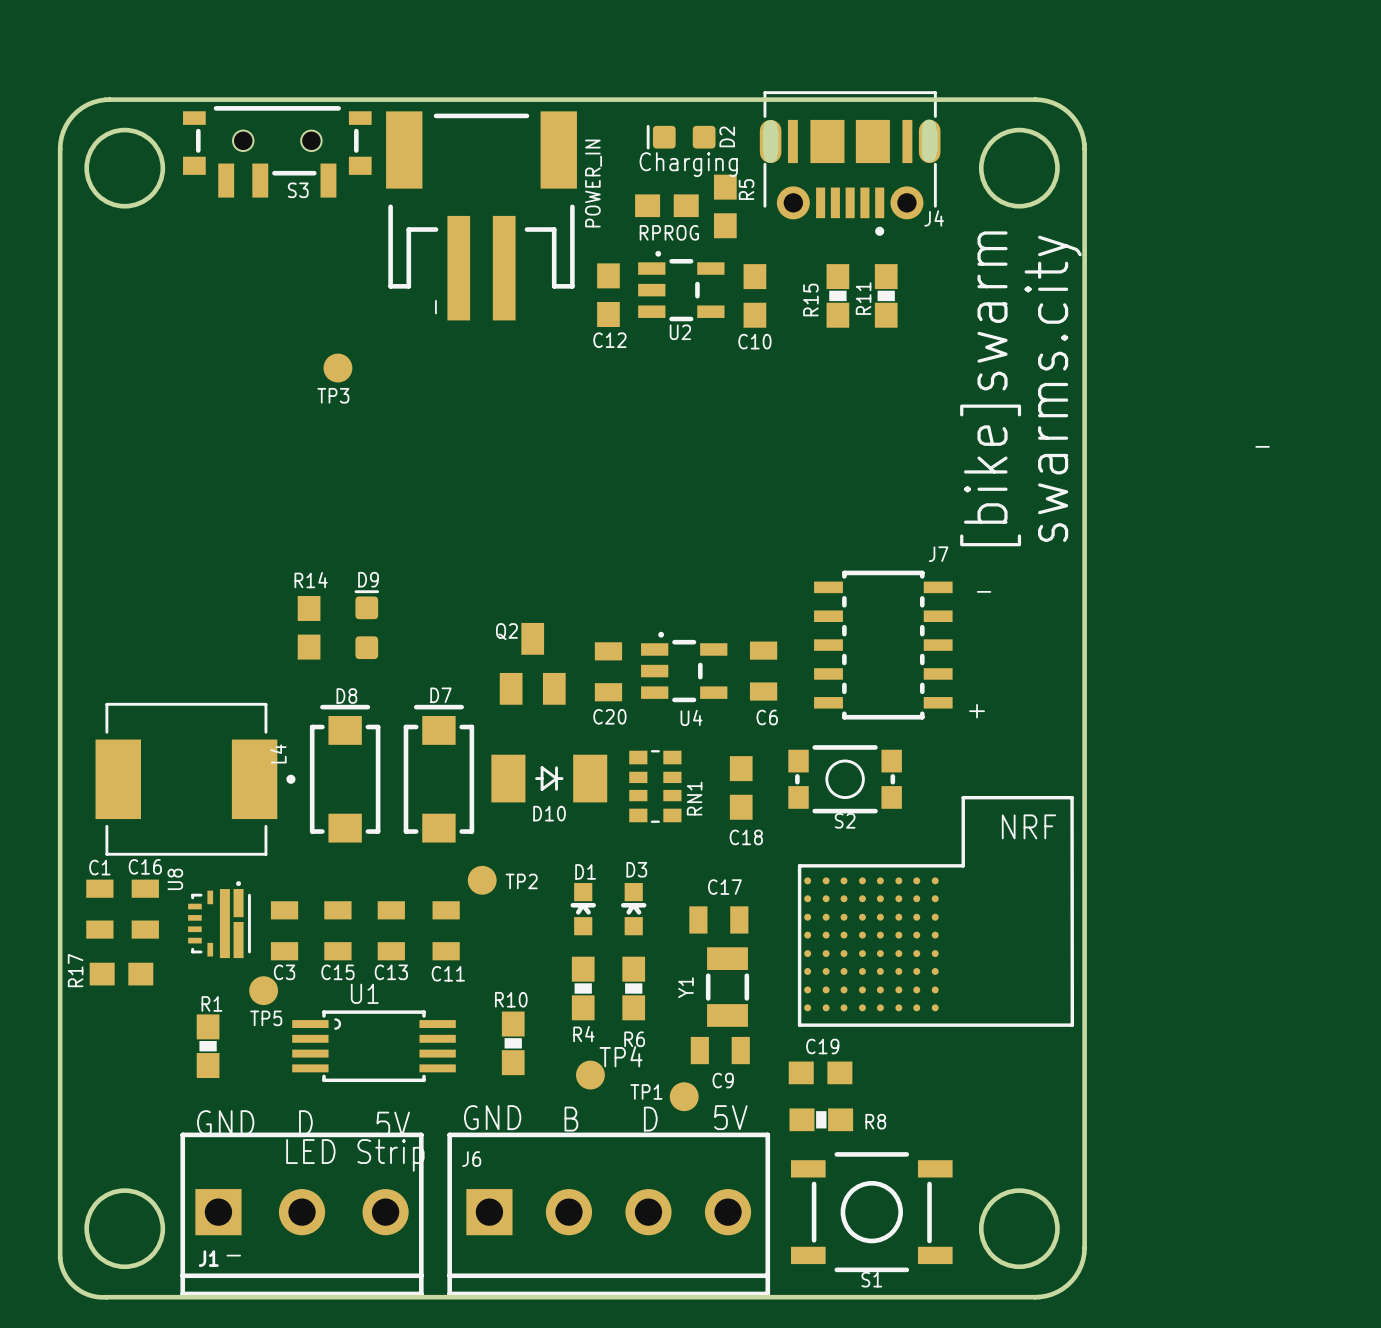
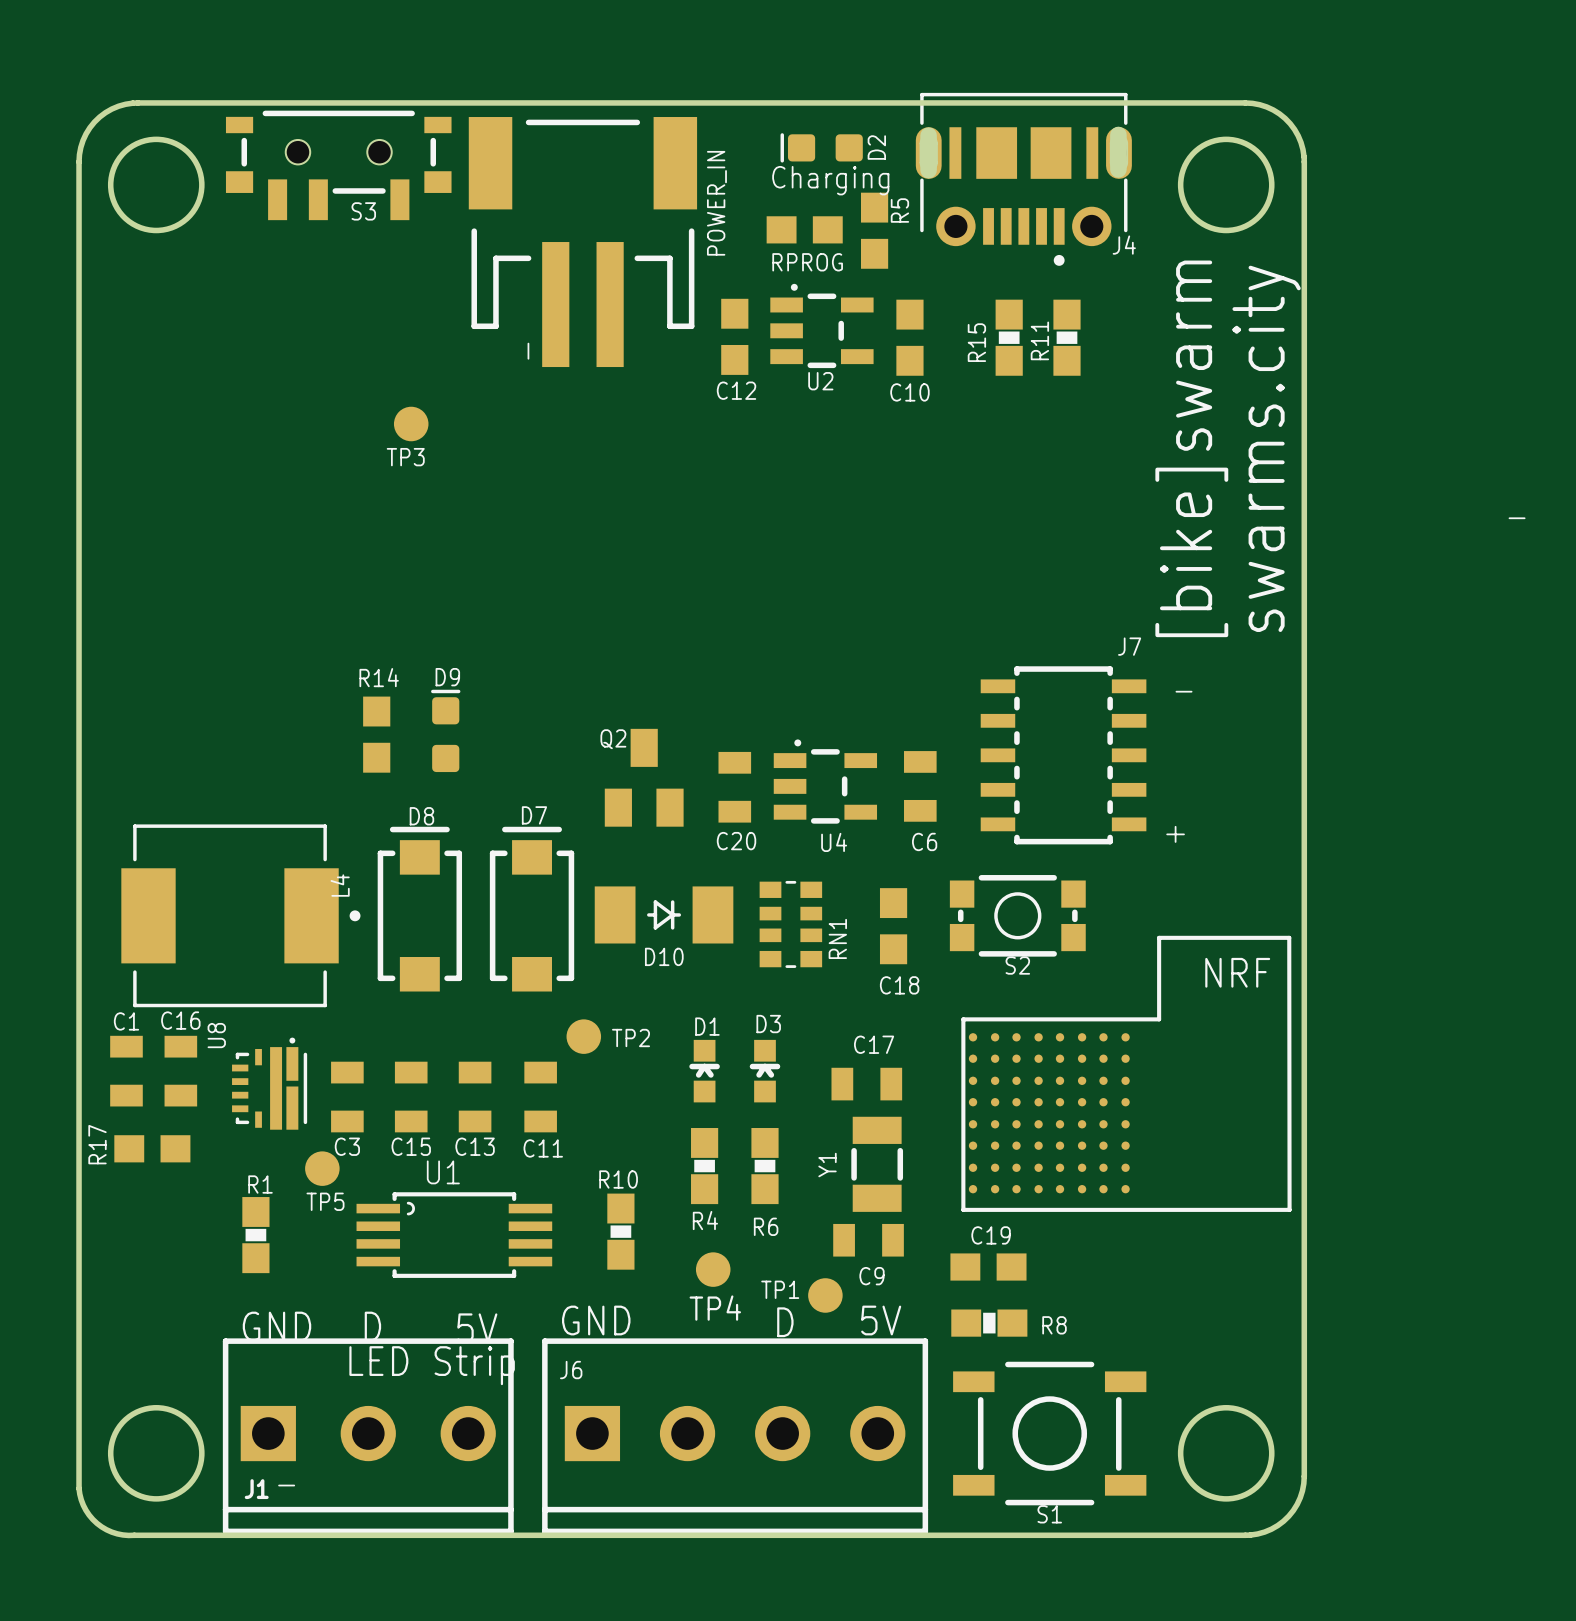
TP4 name position: TP4 (621, 1056) -> TP4 (715, 1308)
text: B (571, 1119) -> none

